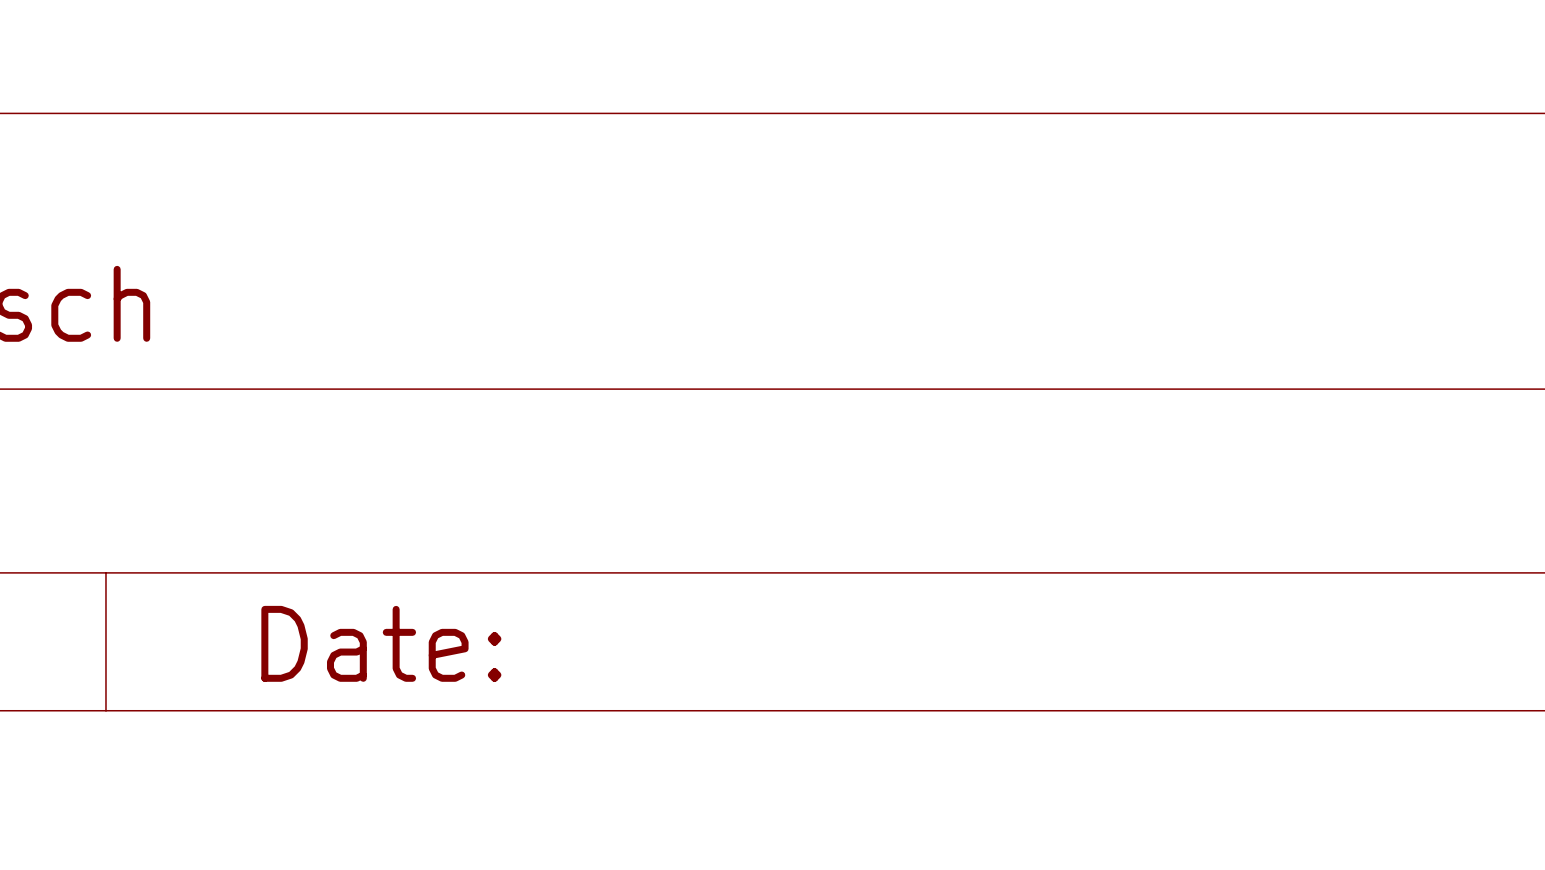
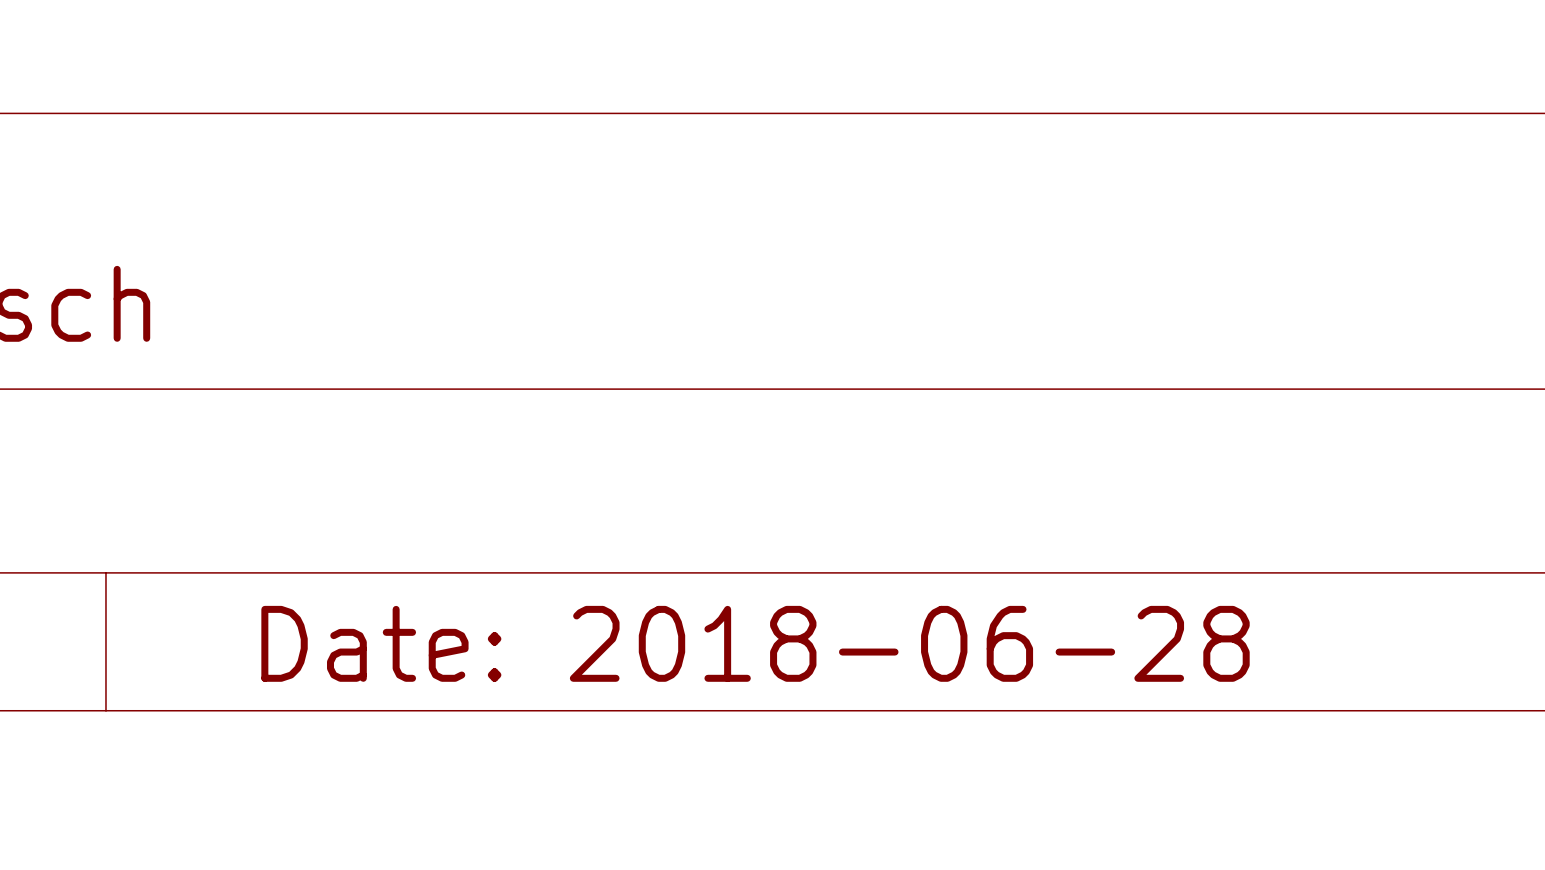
title block: Date: (381, 643) -> Date: 2018-06-28 (755, 643)

